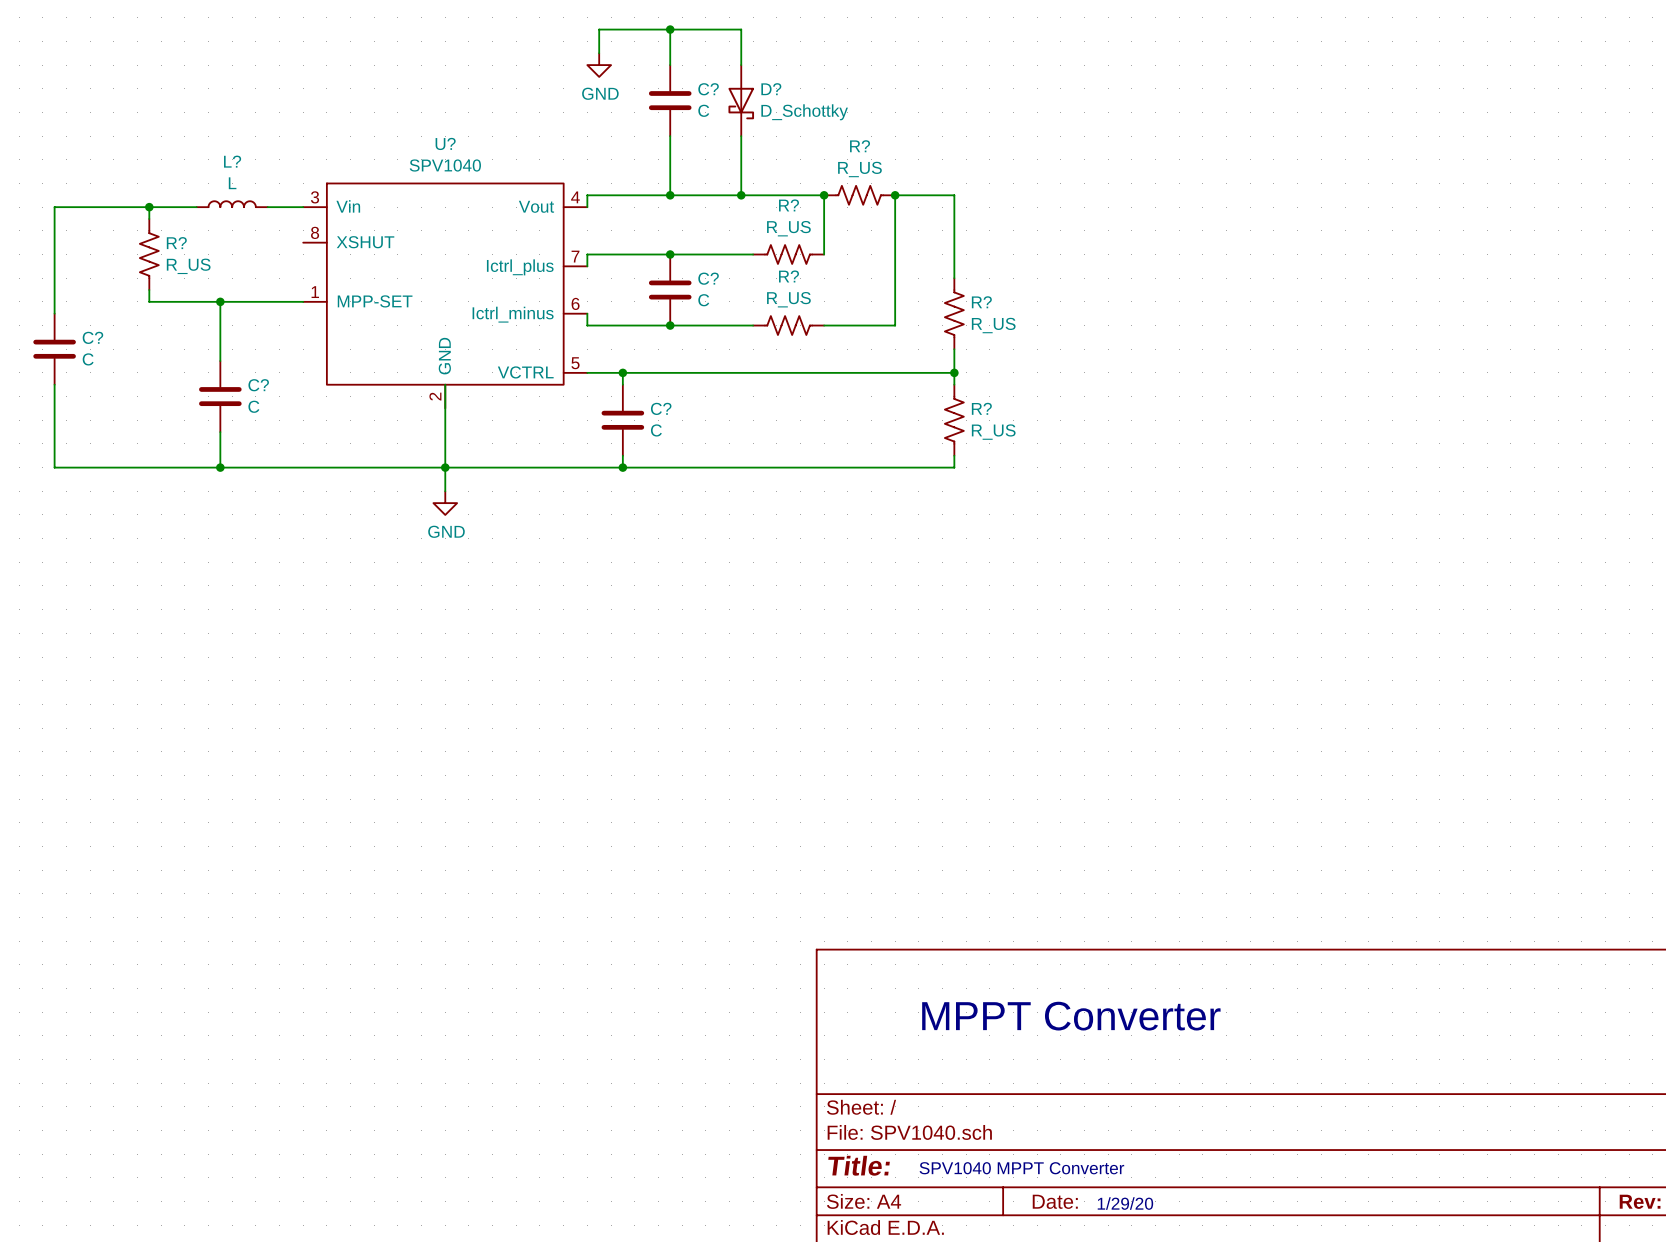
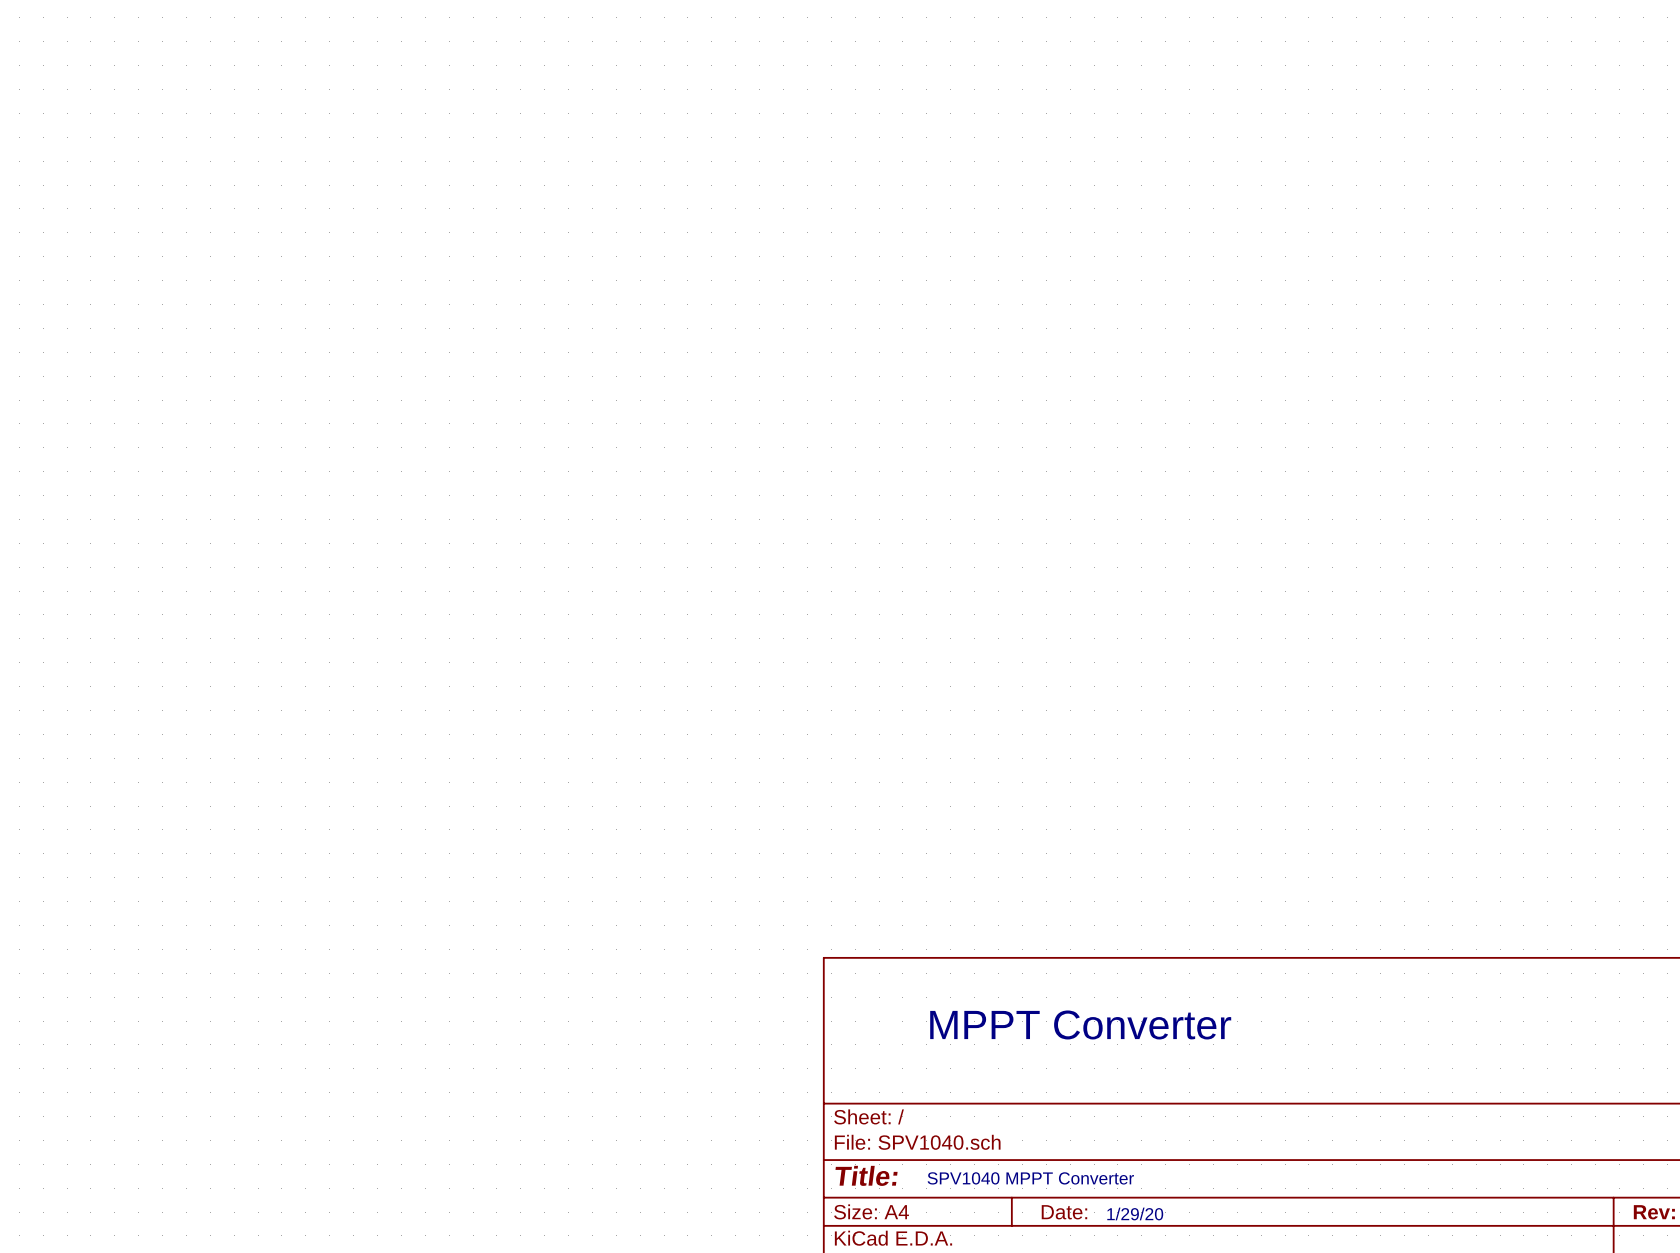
wire: (670, 29) (670, 65) -> none
junction: (670, 29) -> none
wire: (599, 53) (599, 29) (741, 29) (741, 65) -> none
power symbol: GND (599, 65) -> none
C?: C (670, 100) -> none
D?: D_Schottky (741, 100) -> none
wire: (670, 136) (670, 195) -> none
wire: (741, 136) (741, 195) -> none
junction: (670, 195) -> none
junction: (741, 195) -> none
junction: (824, 195) -> none
R?: R_US (859, 195) -> none
junction: (895, 195) -> none
L?: L (232, 204) -> none
wire: (149, 207) (149, 218) -> none
junction: (149, 207) -> none
wire: (196, 207) (54, 207) (54, 313) -> none
wire: (267, 207) (303, 207) -> none
wire: (587, 207) (587, 195) (824, 195) (824, 254) -> none
R?: R_US (149, 254) -> none
junction: (670, 254) -> none
wire: (753, 254) (587, 254) (587, 266) -> none
R?: R_US (788, 254) -> none
wire: (954, 278) (954, 195) (895, 195) (895, 325) (824, 325) -> none
wire: (149, 290) (149, 301) (303, 301) -> none
C?: C (670, 290) -> none
U?: SPV1040 (445, 295) -> none
wire: (220, 301) (220, 361) -> none
junction: (220, 301) -> none
wire: (587, 313) (587, 325) (753, 325) -> none
R?: R_US (954, 313) -> none
junction: (670, 325) -> none
R?: R_US (788, 325) -> none
C?: C (54, 349) -> none
wire: (954, 349) (954, 384) -> none
wire: (587, 372) (954, 372) -> none
wire: (622, 372) (622, 384) -> none
junction: (622, 372) -> none
junction: (954, 372) -> none
wire: (54, 384) (54, 467) (954, 467) (954, 455) -> none
wire: (445, 384) (445, 491) -> none
C?: C (220, 396) -> none
C?: C (622, 420) -> none
R?: R_US (954, 420) -> none
wire: (220, 432) (220, 467) -> none
wire: (622, 455) (622, 467) -> none
junction: (220, 467) -> none
junction: (445, 467) -> none
junction: (622, 467) -> none
power symbol: GND (445, 503) -> none

